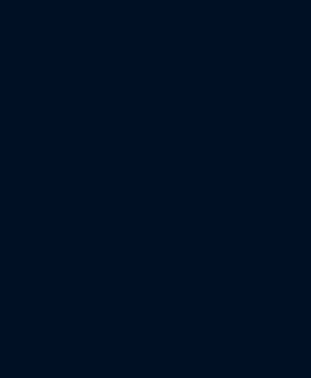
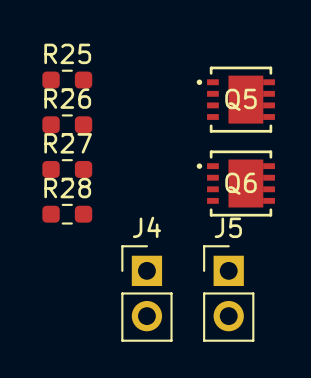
R25: none -> (67, 80)
Q5: none -> (235, 99)
R26: none -> (67, 124)
R27: none -> (67, 169)
Q6: none -> (235, 183)
R28: none -> (67, 214)
J4: none -> (146, 293)
J5: none -> (228, 293)

